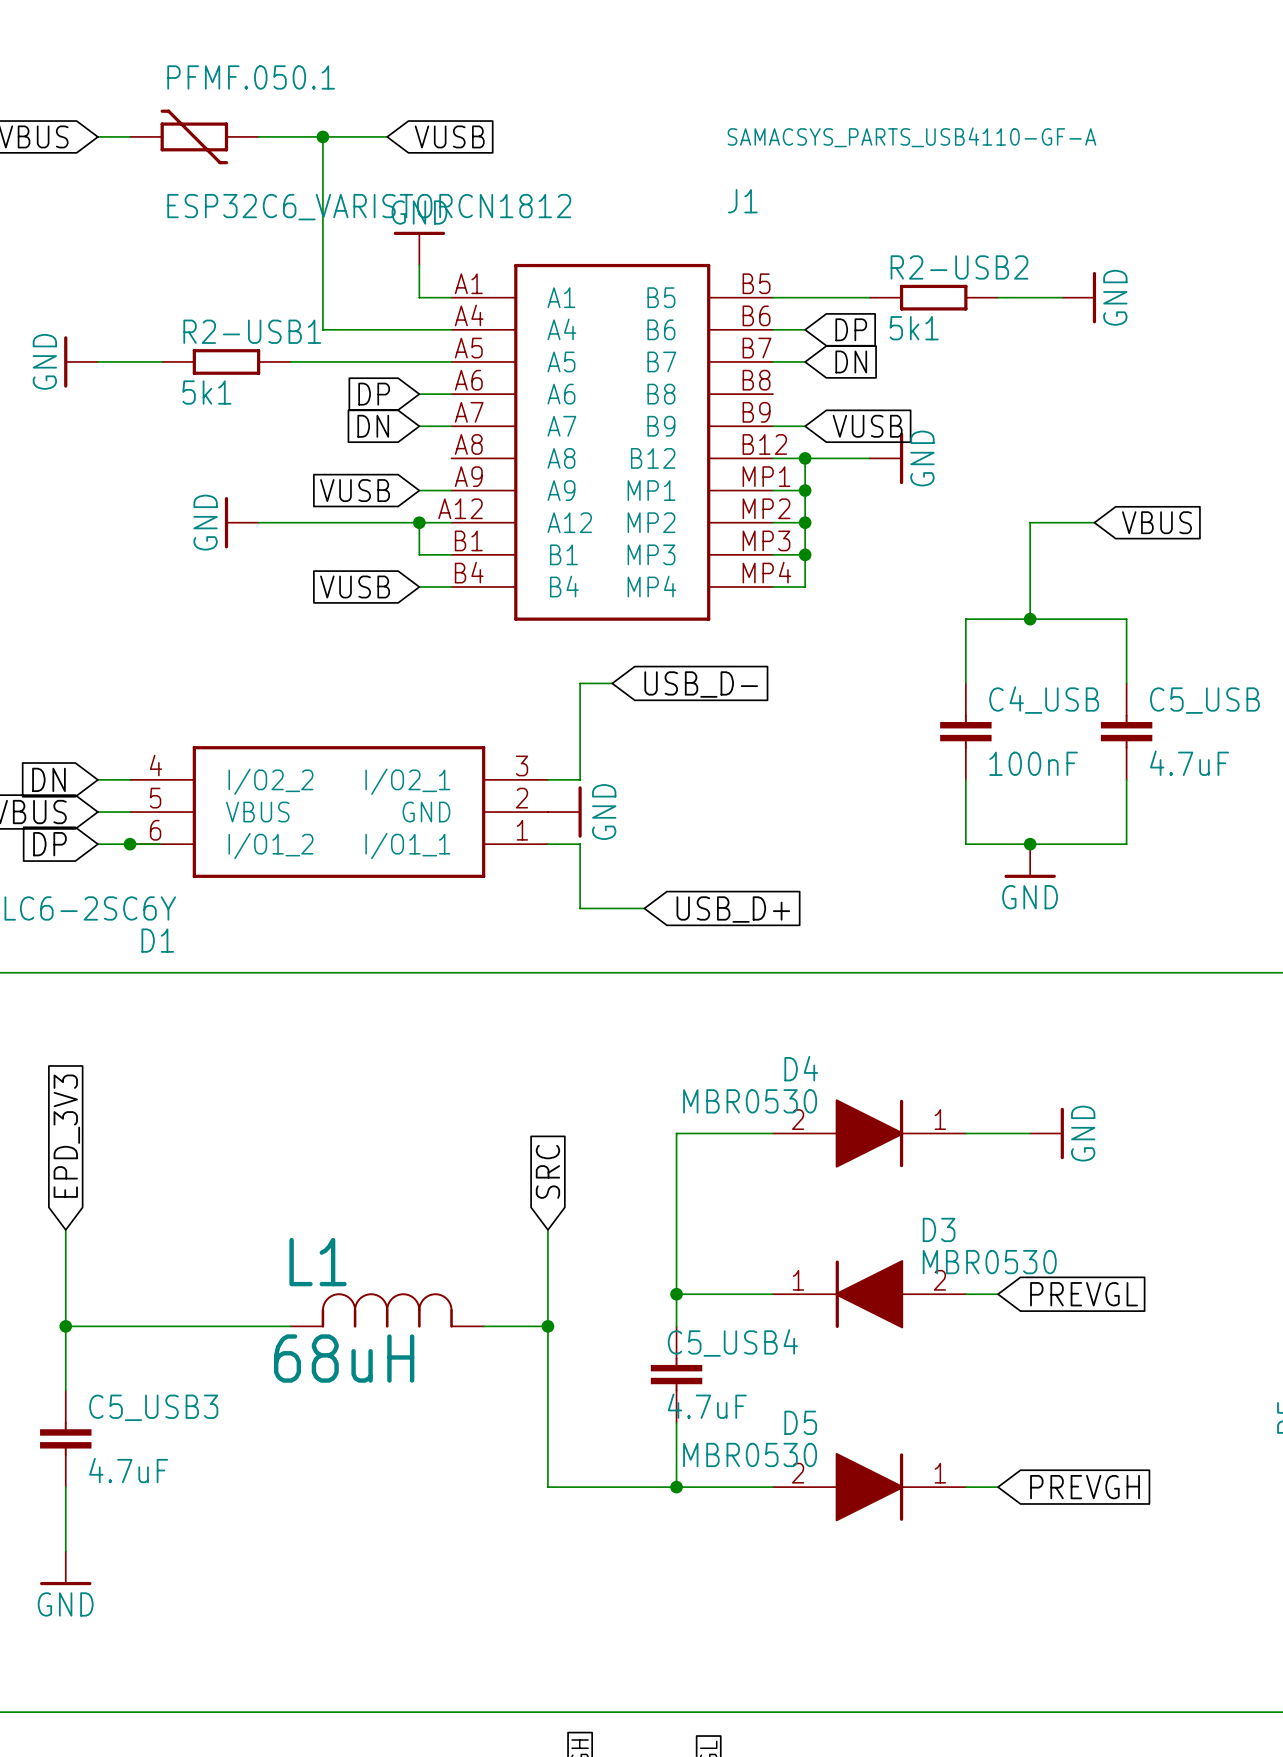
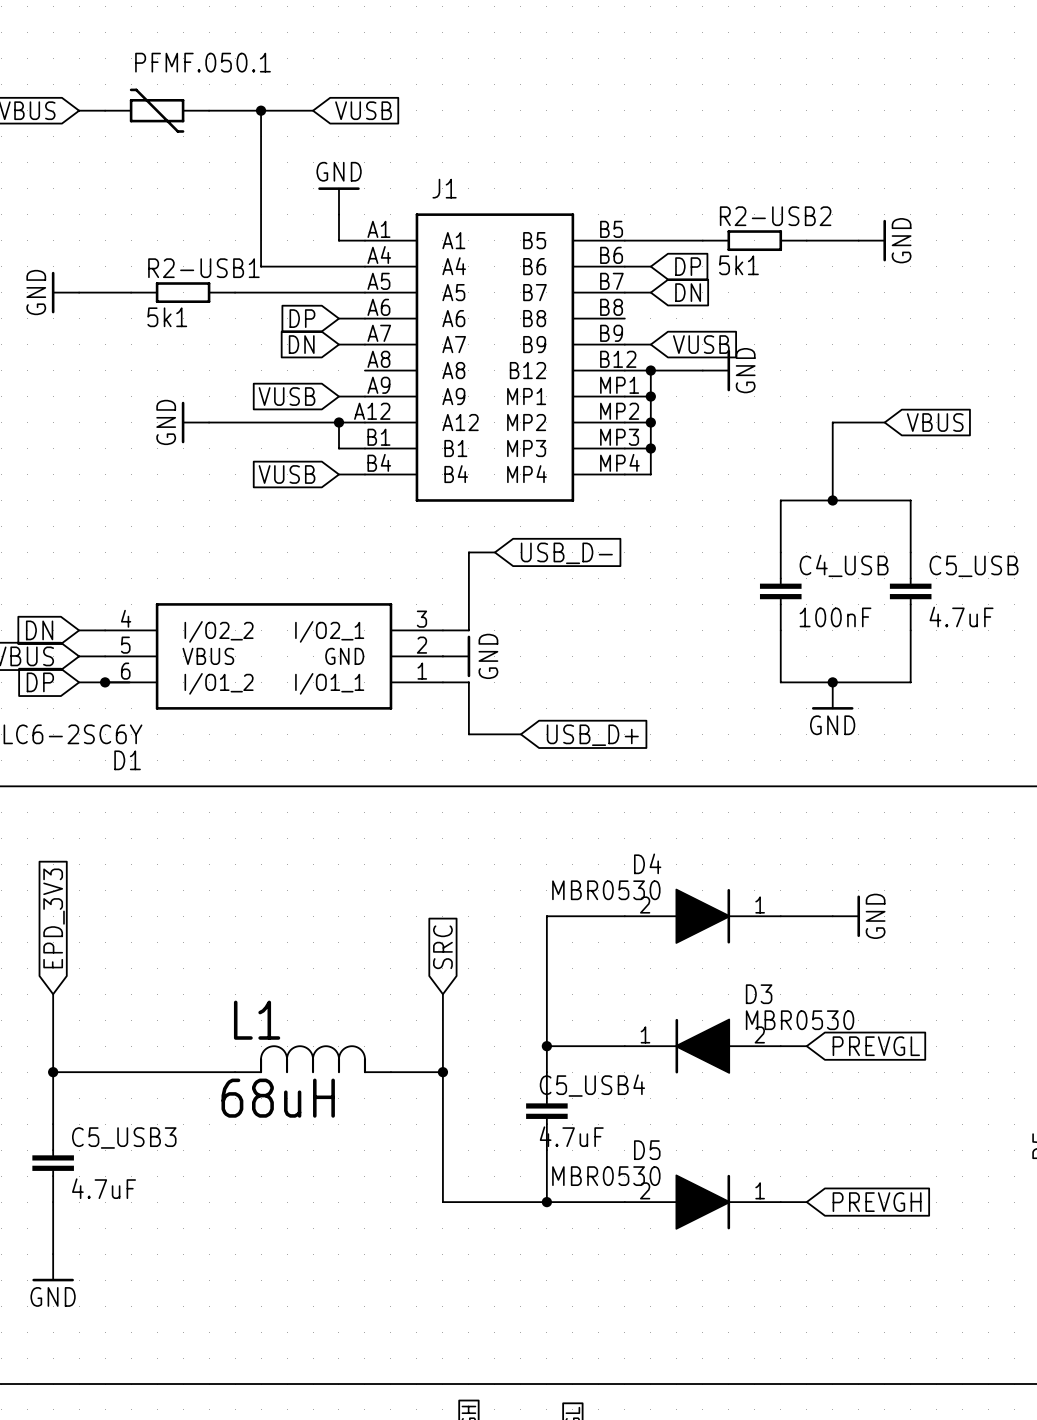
J1 value: SAMACSYS_PARTS_USB4110-GF-A (911, 137) -> none
J1 name position: J1 (742, 201) -> J1 (444, 188)
PFMF.050.1 value: ESP32C6_VARISTORCN1812 (369, 207) -> none

